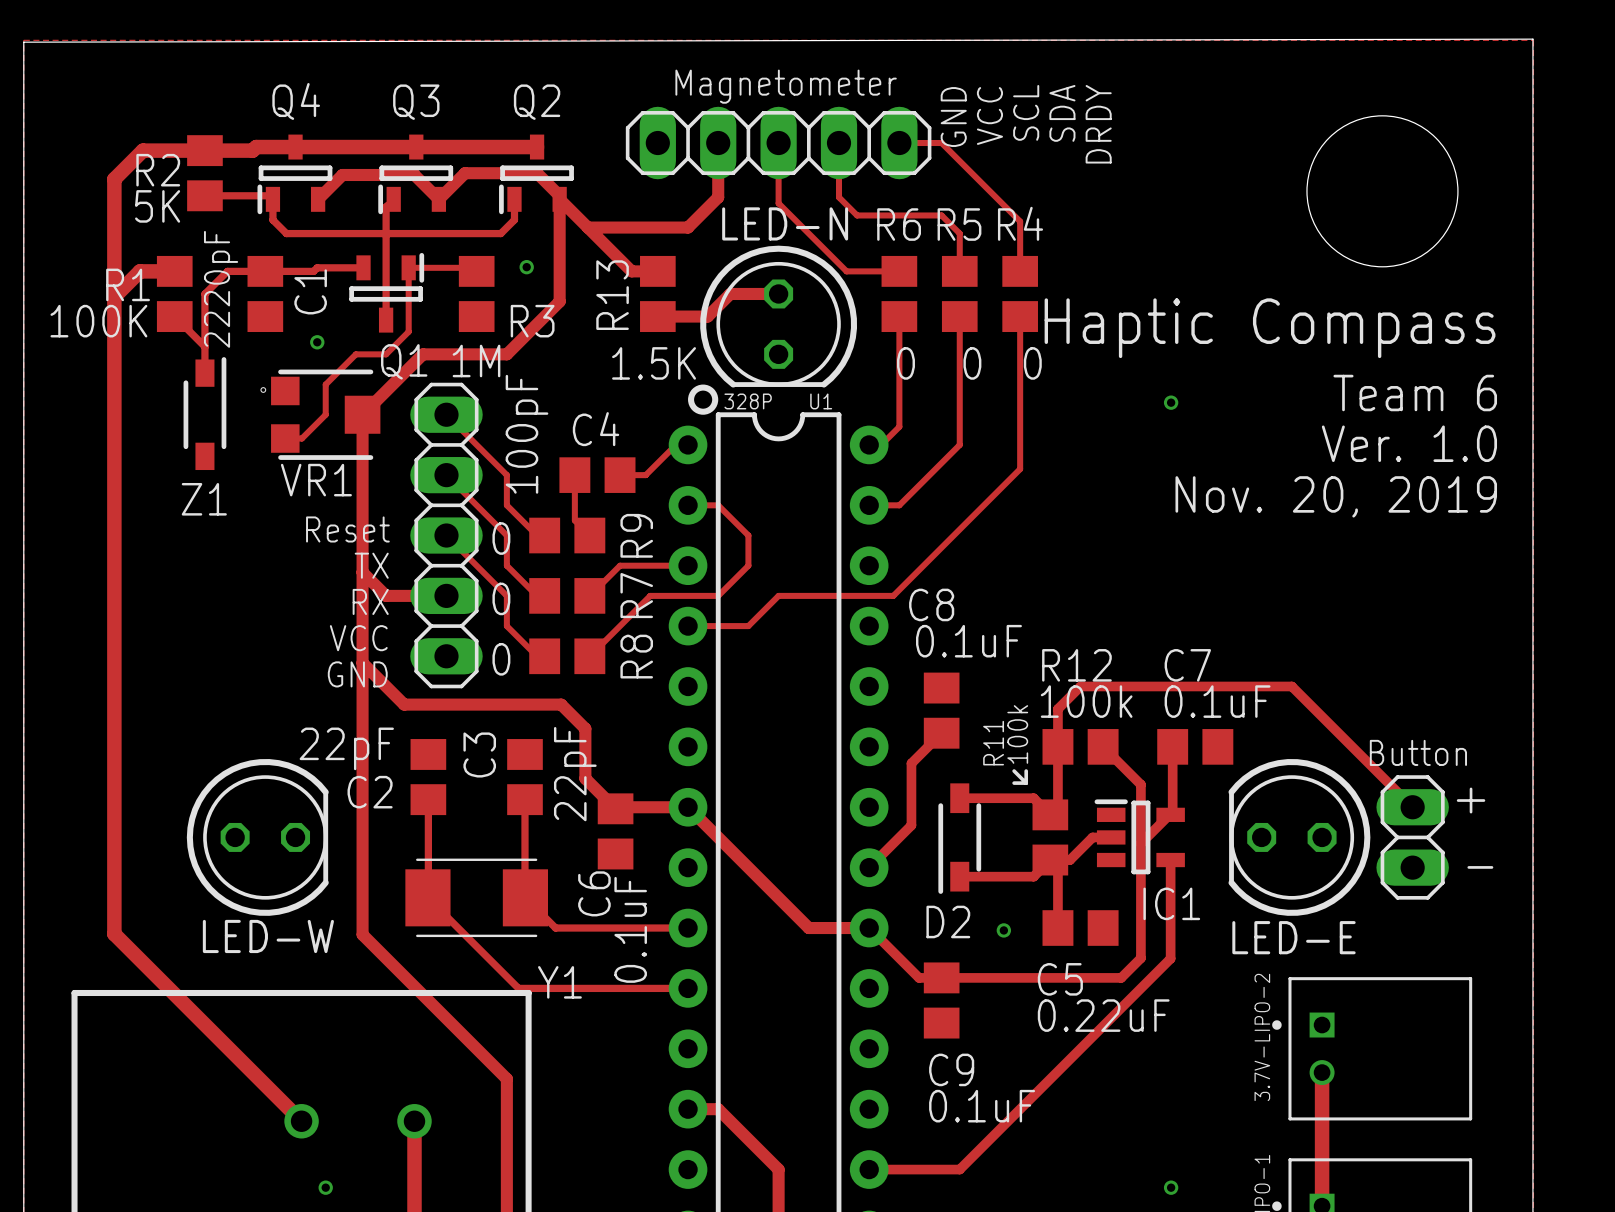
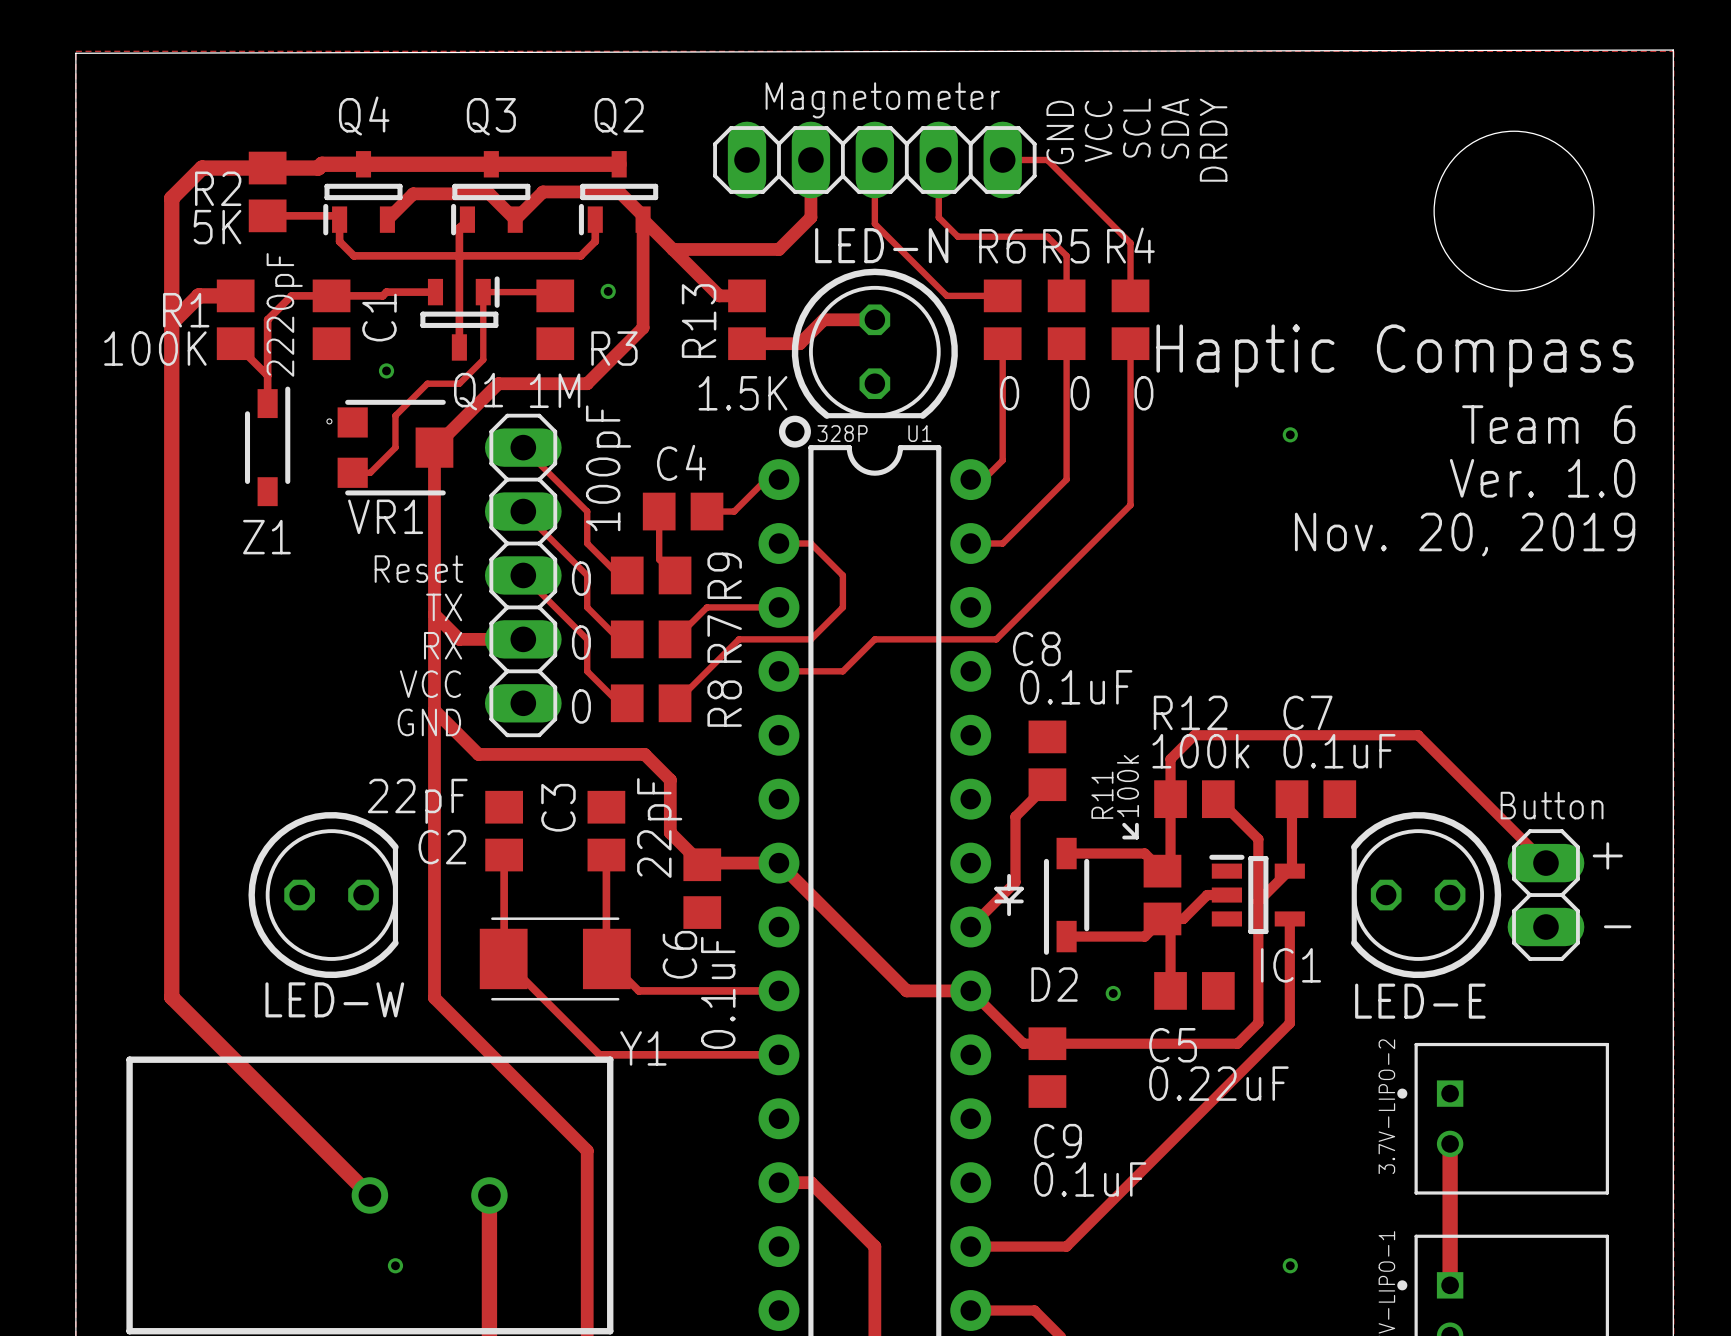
line: none -> (1009, 875) (1009, 888)
line: none -> (996, 901) (1021, 901)
line: none -> (1009, 901) (996, 888) (1021, 888) (1009, 901)
line: none -> (1009, 901) (1009, 914)

